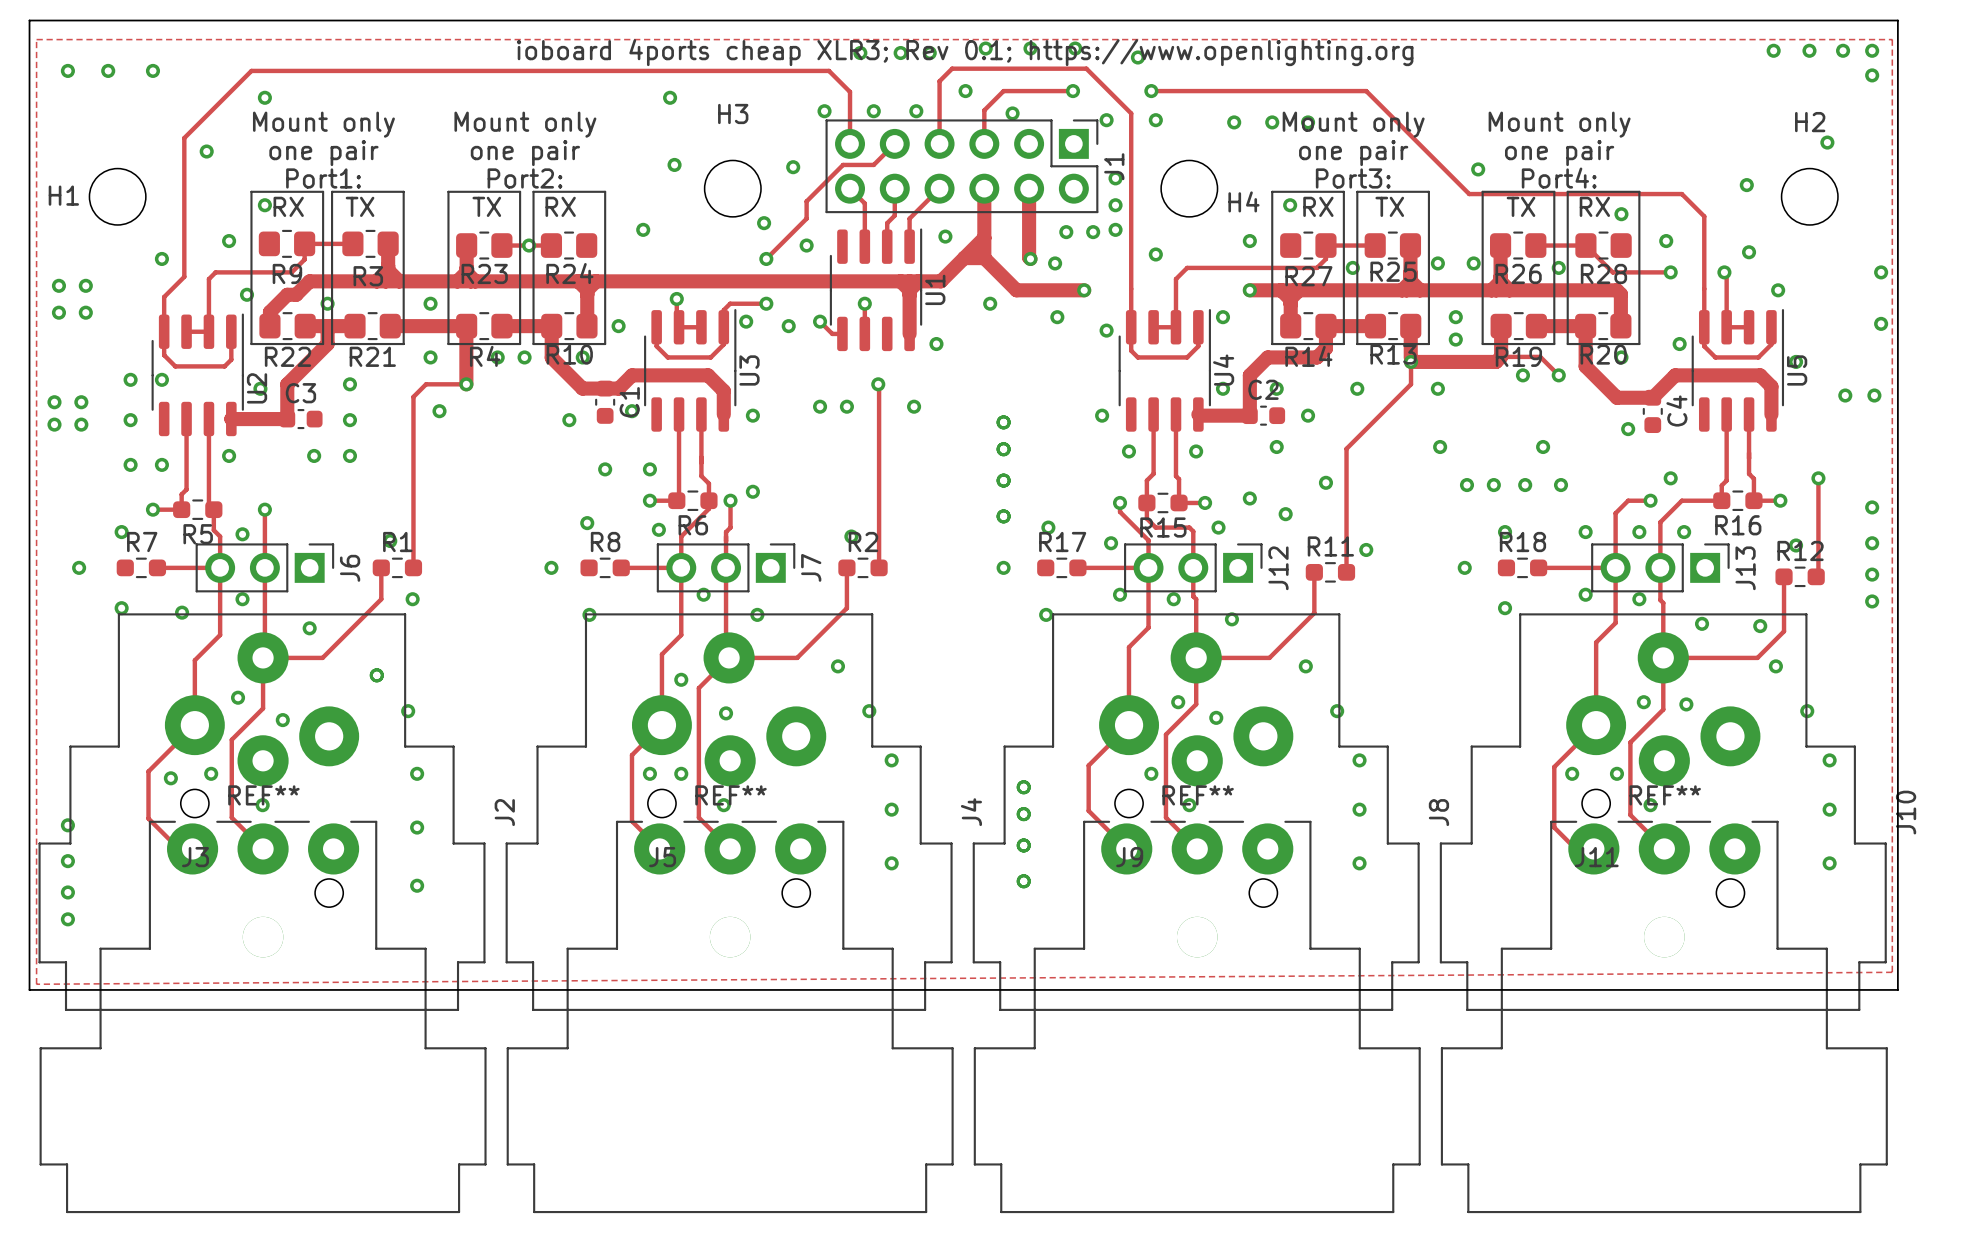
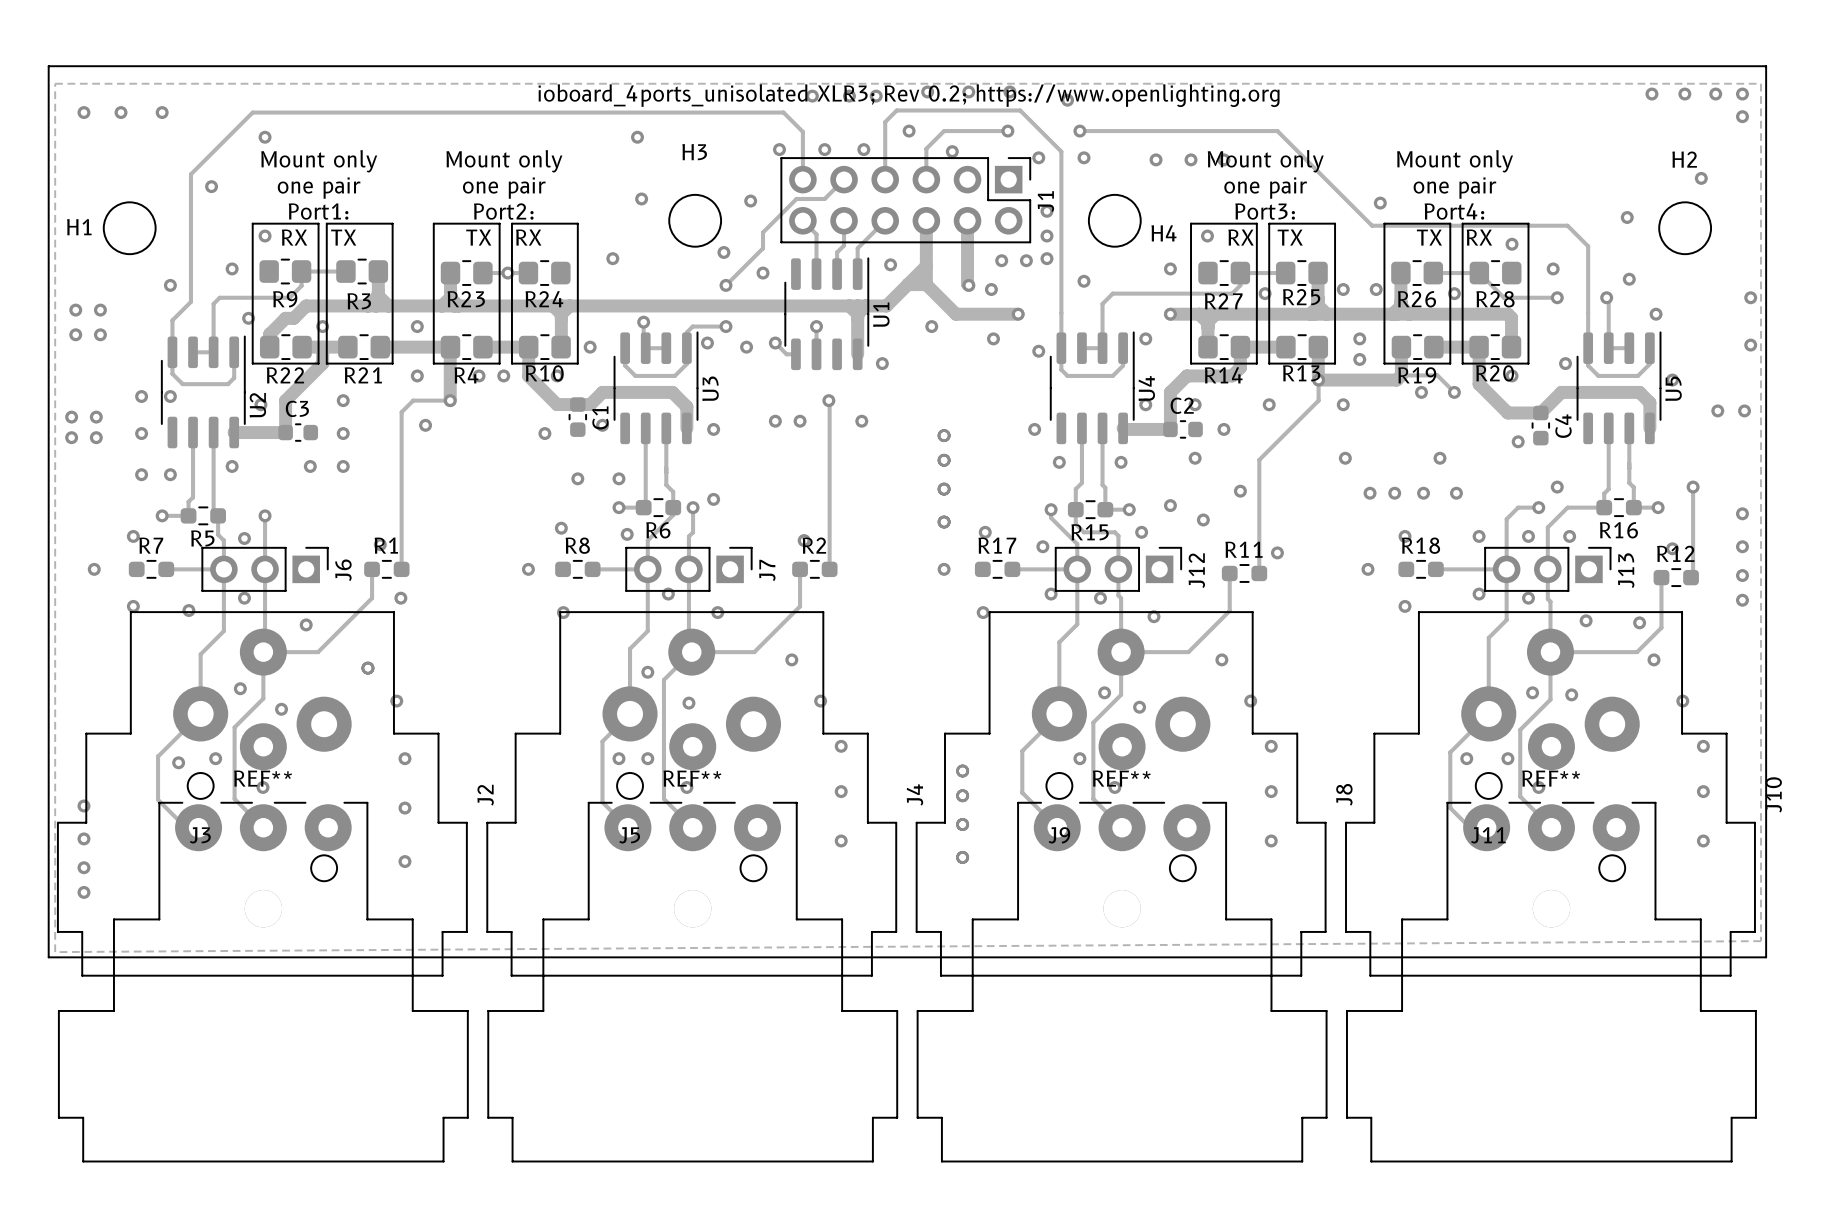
text: ioboard 4ports cheap XLR3; Rev 0.1; https://www.openlighting.org (965, 52) -> ioboard_4ports_unisolated XLR3; Rev 0.2; https://www.openlighting.org (909, 95)

